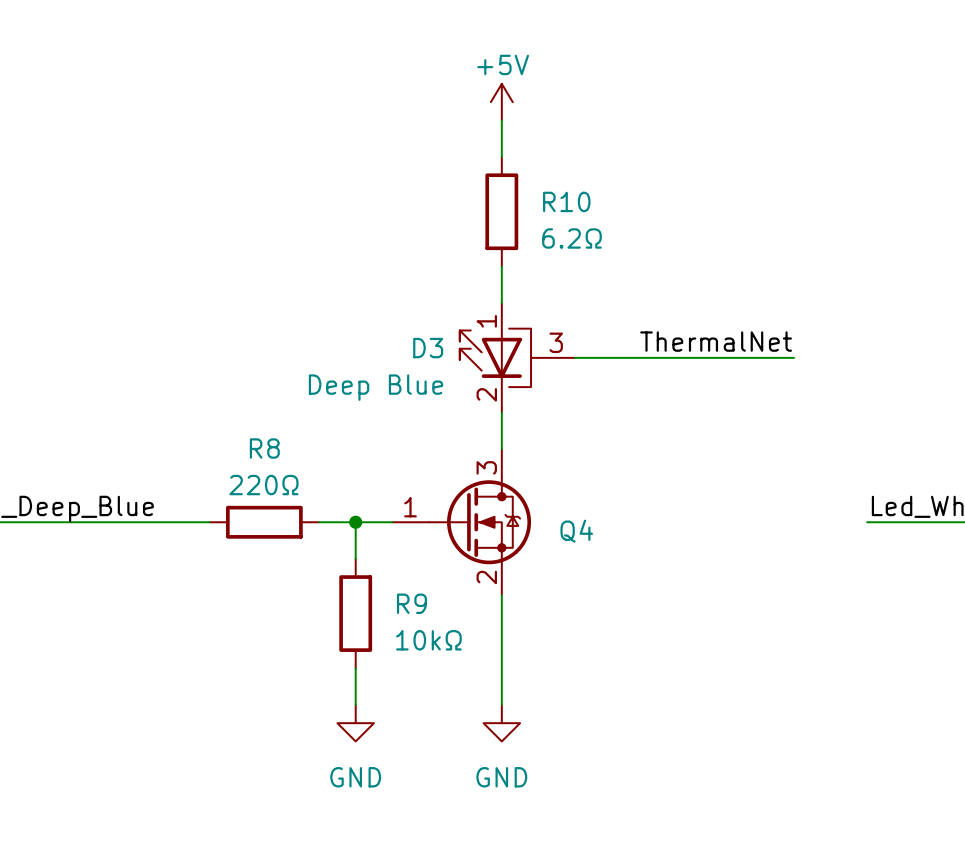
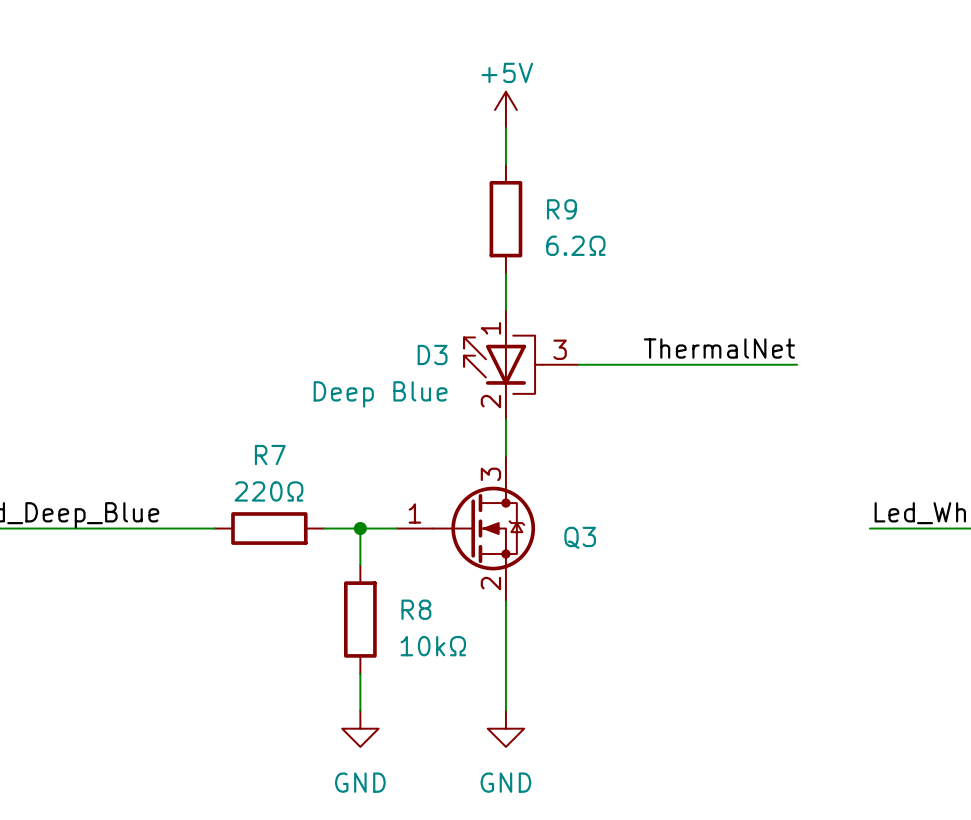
R10 name: R10 (566, 201) -> R9 (561, 209)
R8 name: R8 (264, 448) -> R7 (270, 455)
Q4 name: Q4 (576, 531) -> Q3 (580, 537)
R9 name: R9 (411, 603) -> R8 (416, 609)

